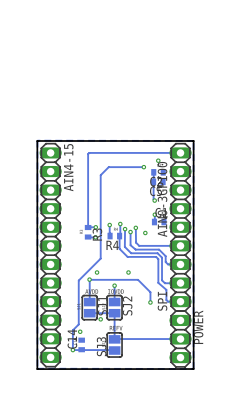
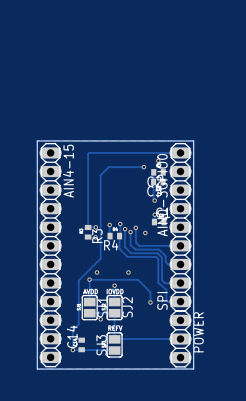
via: (80, 331) -> none

